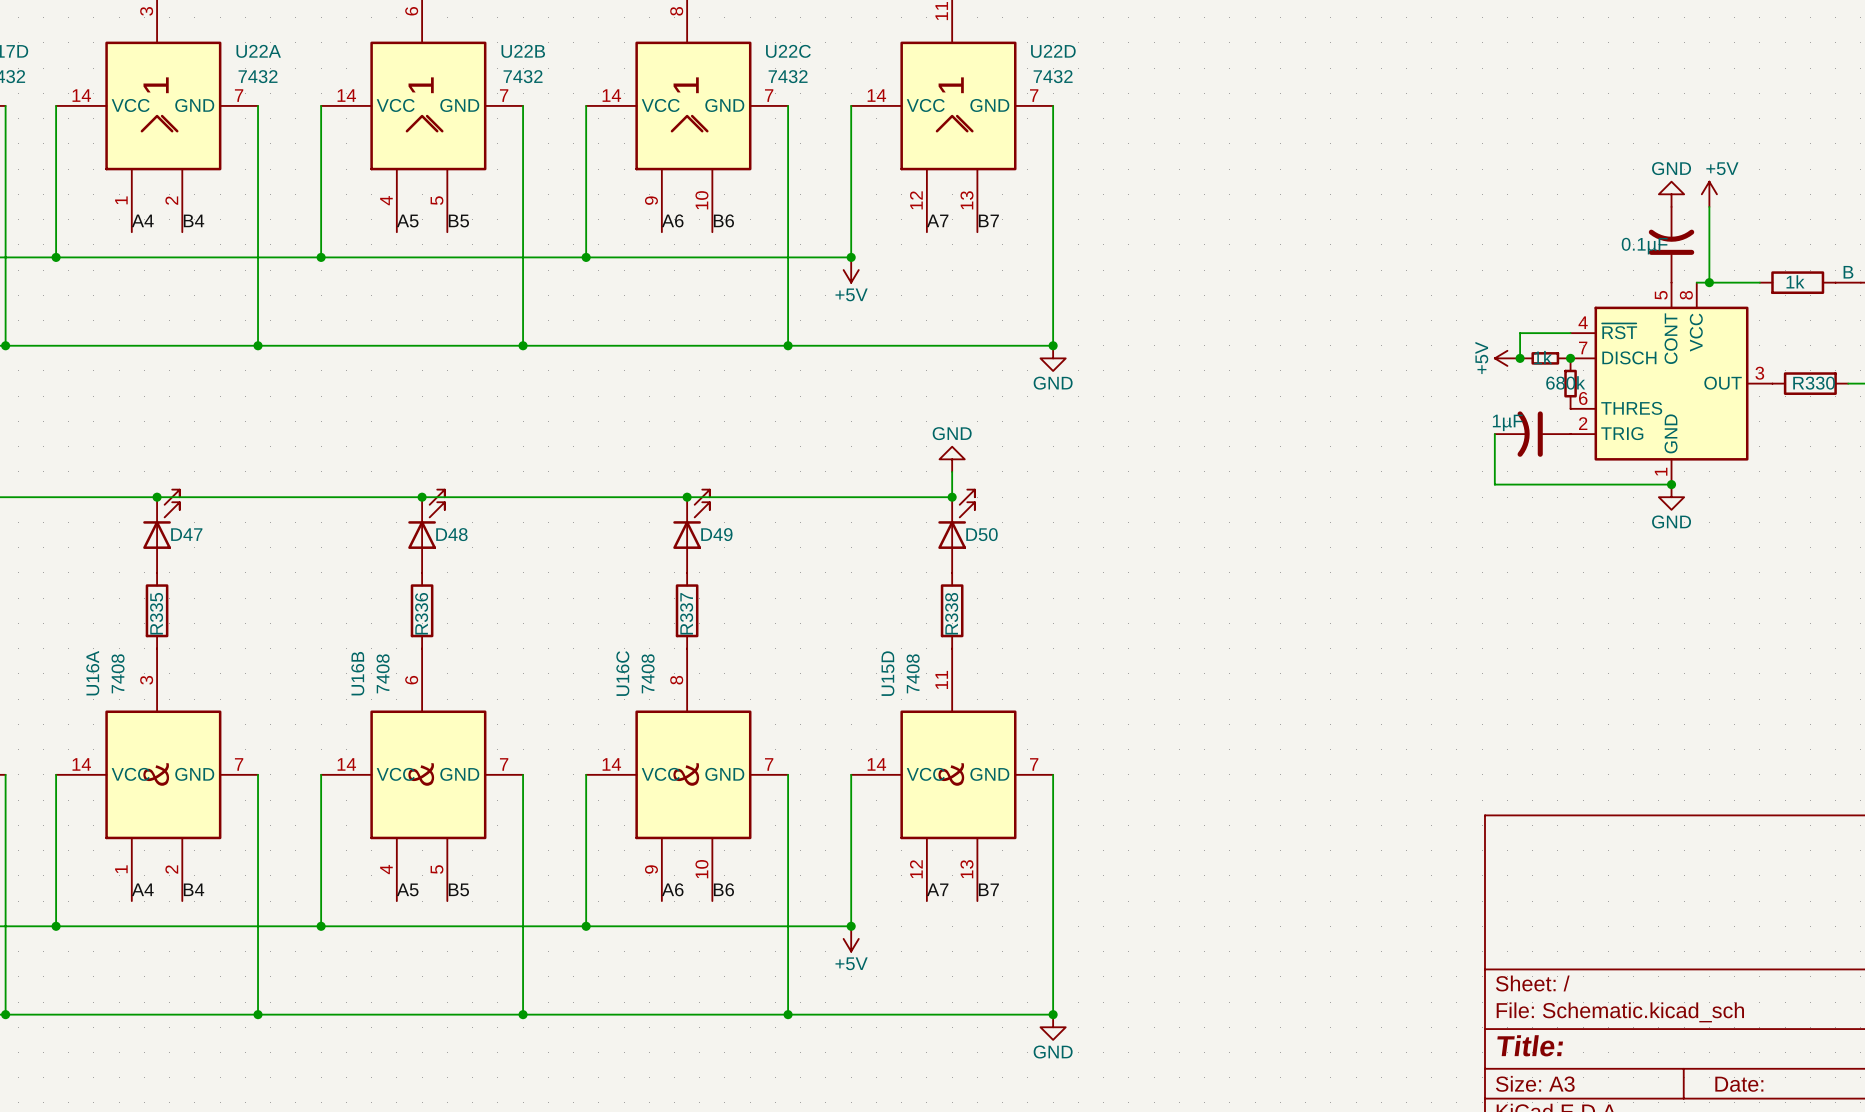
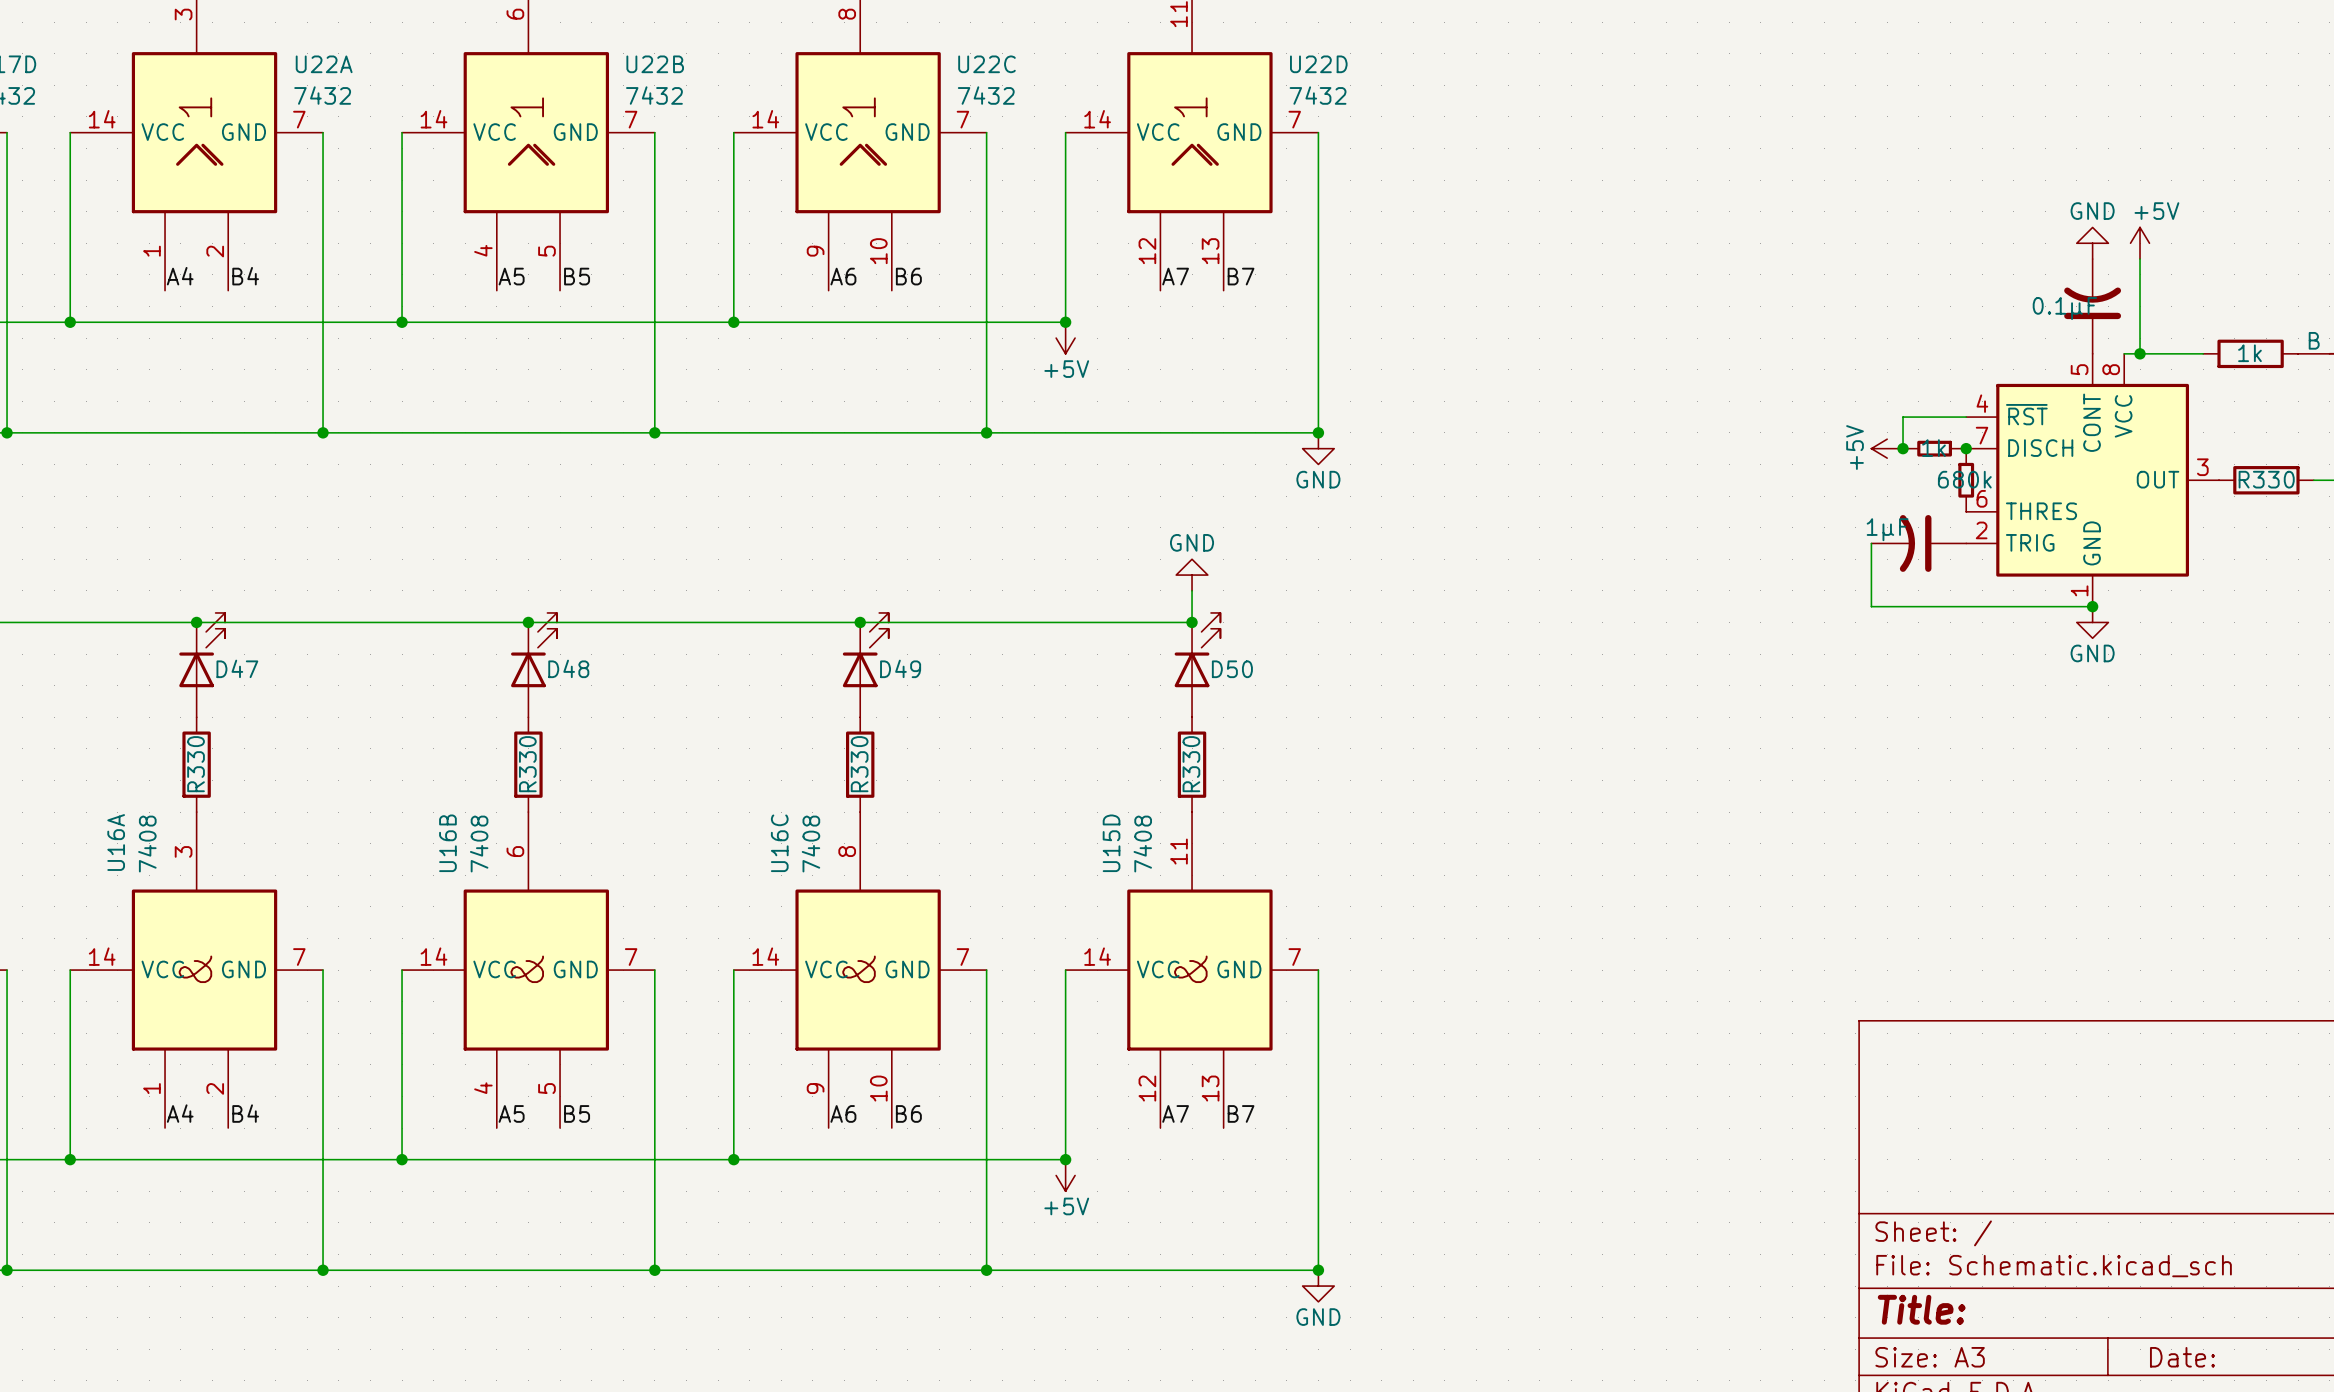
R335 name: R335 (156, 613) -> R330 (196, 764)
R336 name: R336 (421, 613) -> R330 (527, 764)
R337 name: R337 (686, 613) -> R330 (859, 764)
R338 name: R338 (951, 613) -> R330 (1191, 764)

